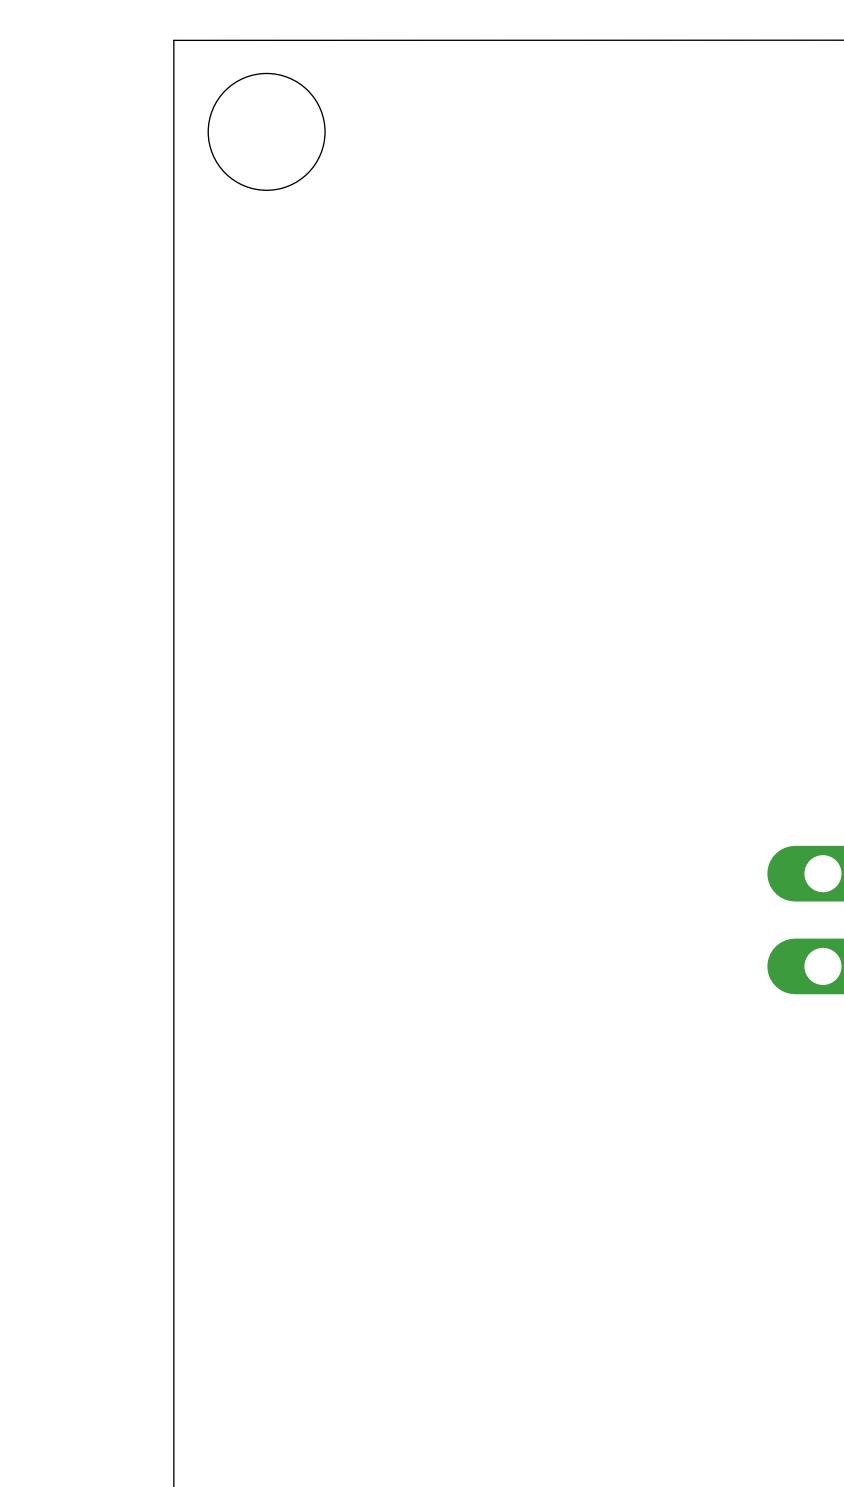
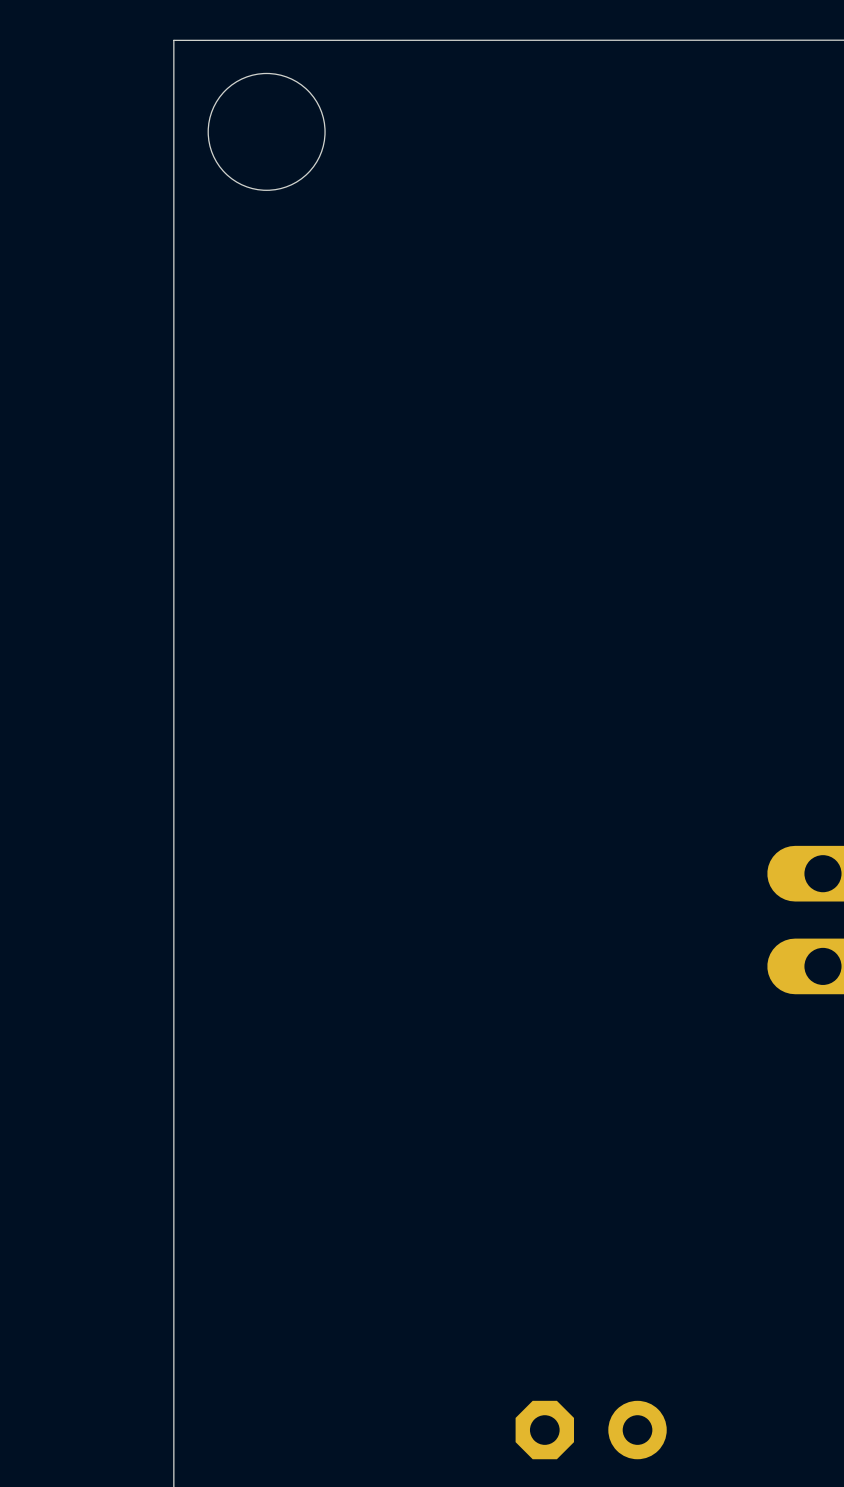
part: none -> (591, 1430)

